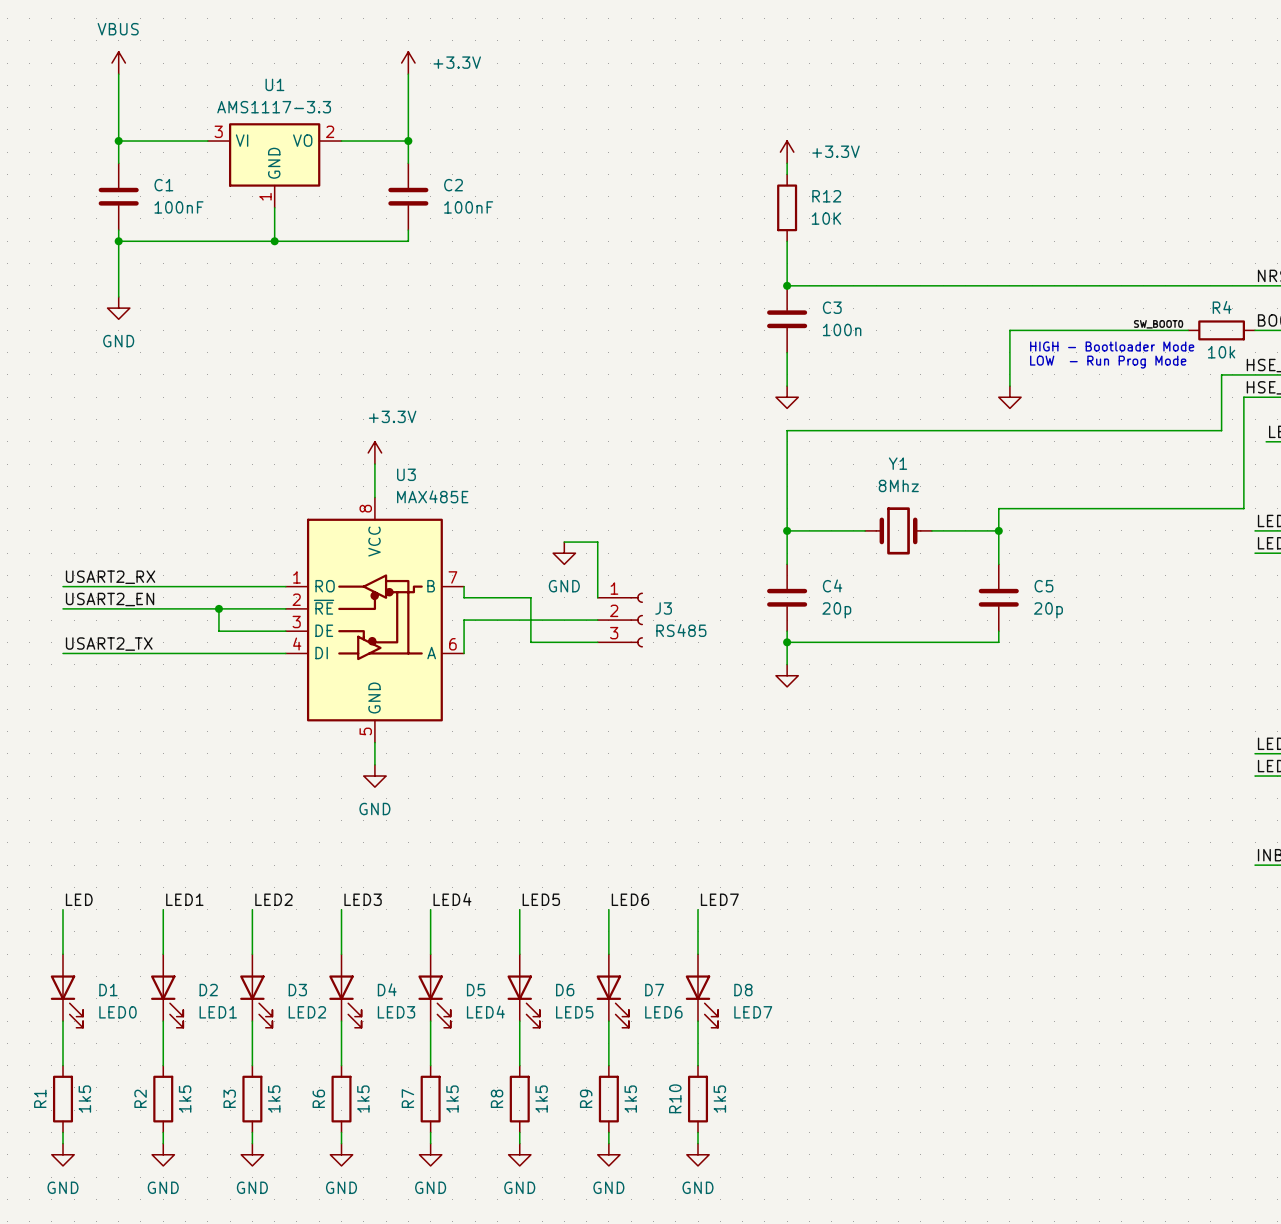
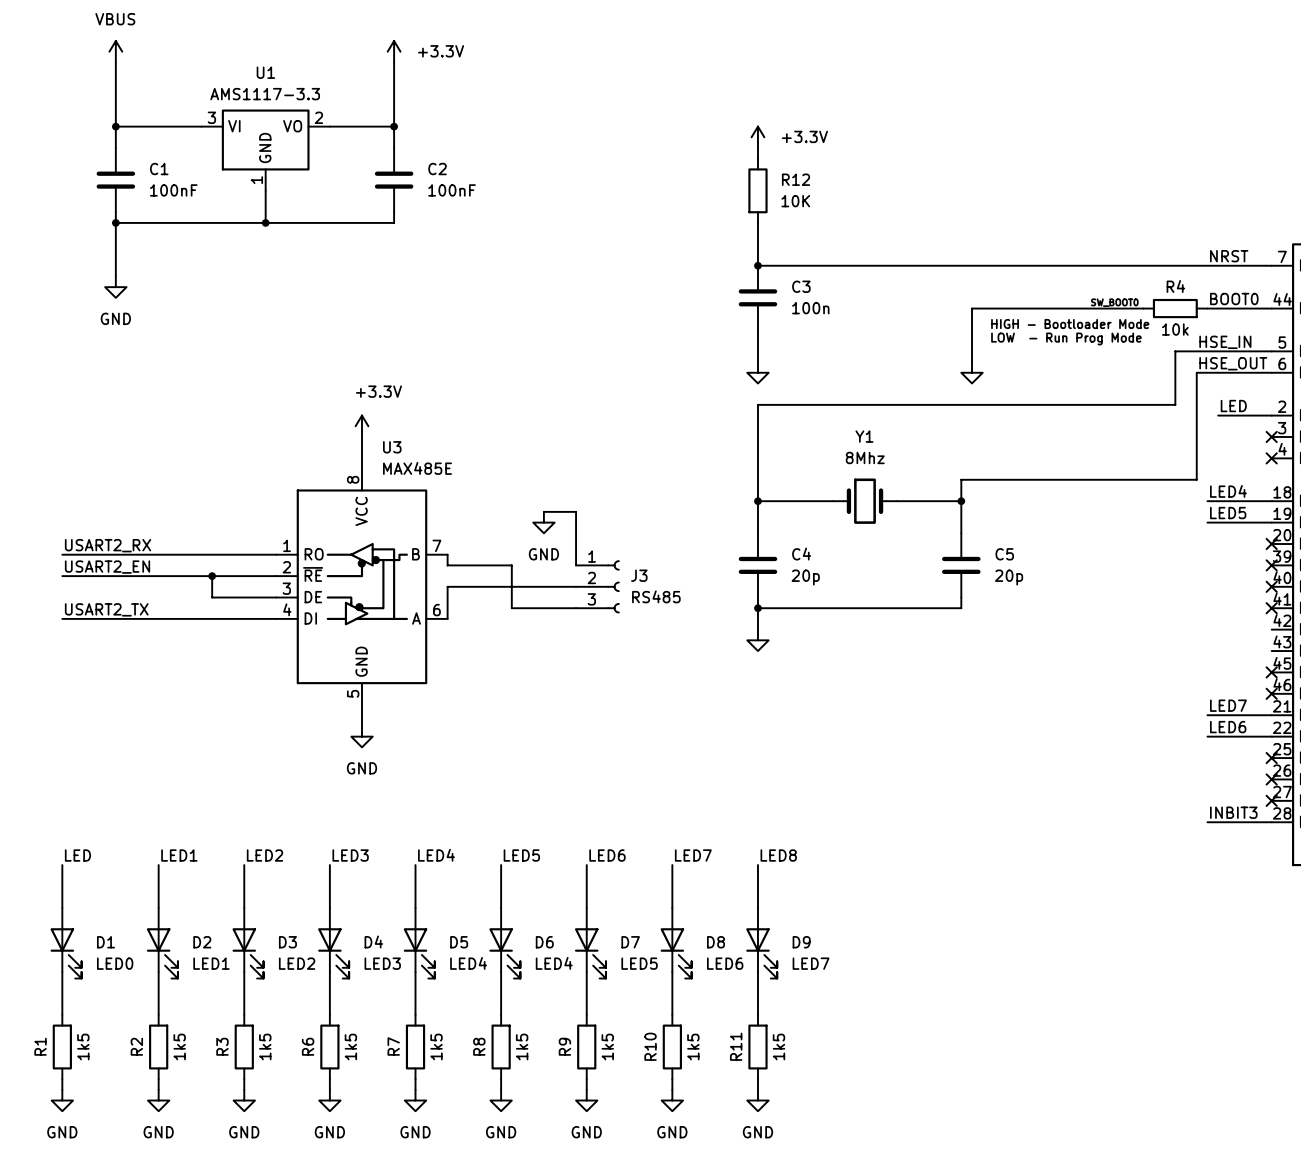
label: none -> LED8 (778, 855)
wire: none -> (757, 865) (757, 907)
D9: none -> LED7 (761, 943)
D6 value: LED5 (574, 1012) -> LED4 (554, 963)
D7 value: LED6 (663, 1012) -> LED5 (639, 963)
D8 value: LED7 (753, 1012) -> LED6 (725, 963)
wire: none -> (757, 972) (757, 1014)
R11: none -> 1k5 (757, 1047)
wire: none -> (757, 1079) (757, 1089)
power symbol: none -> GND (757, 1100)

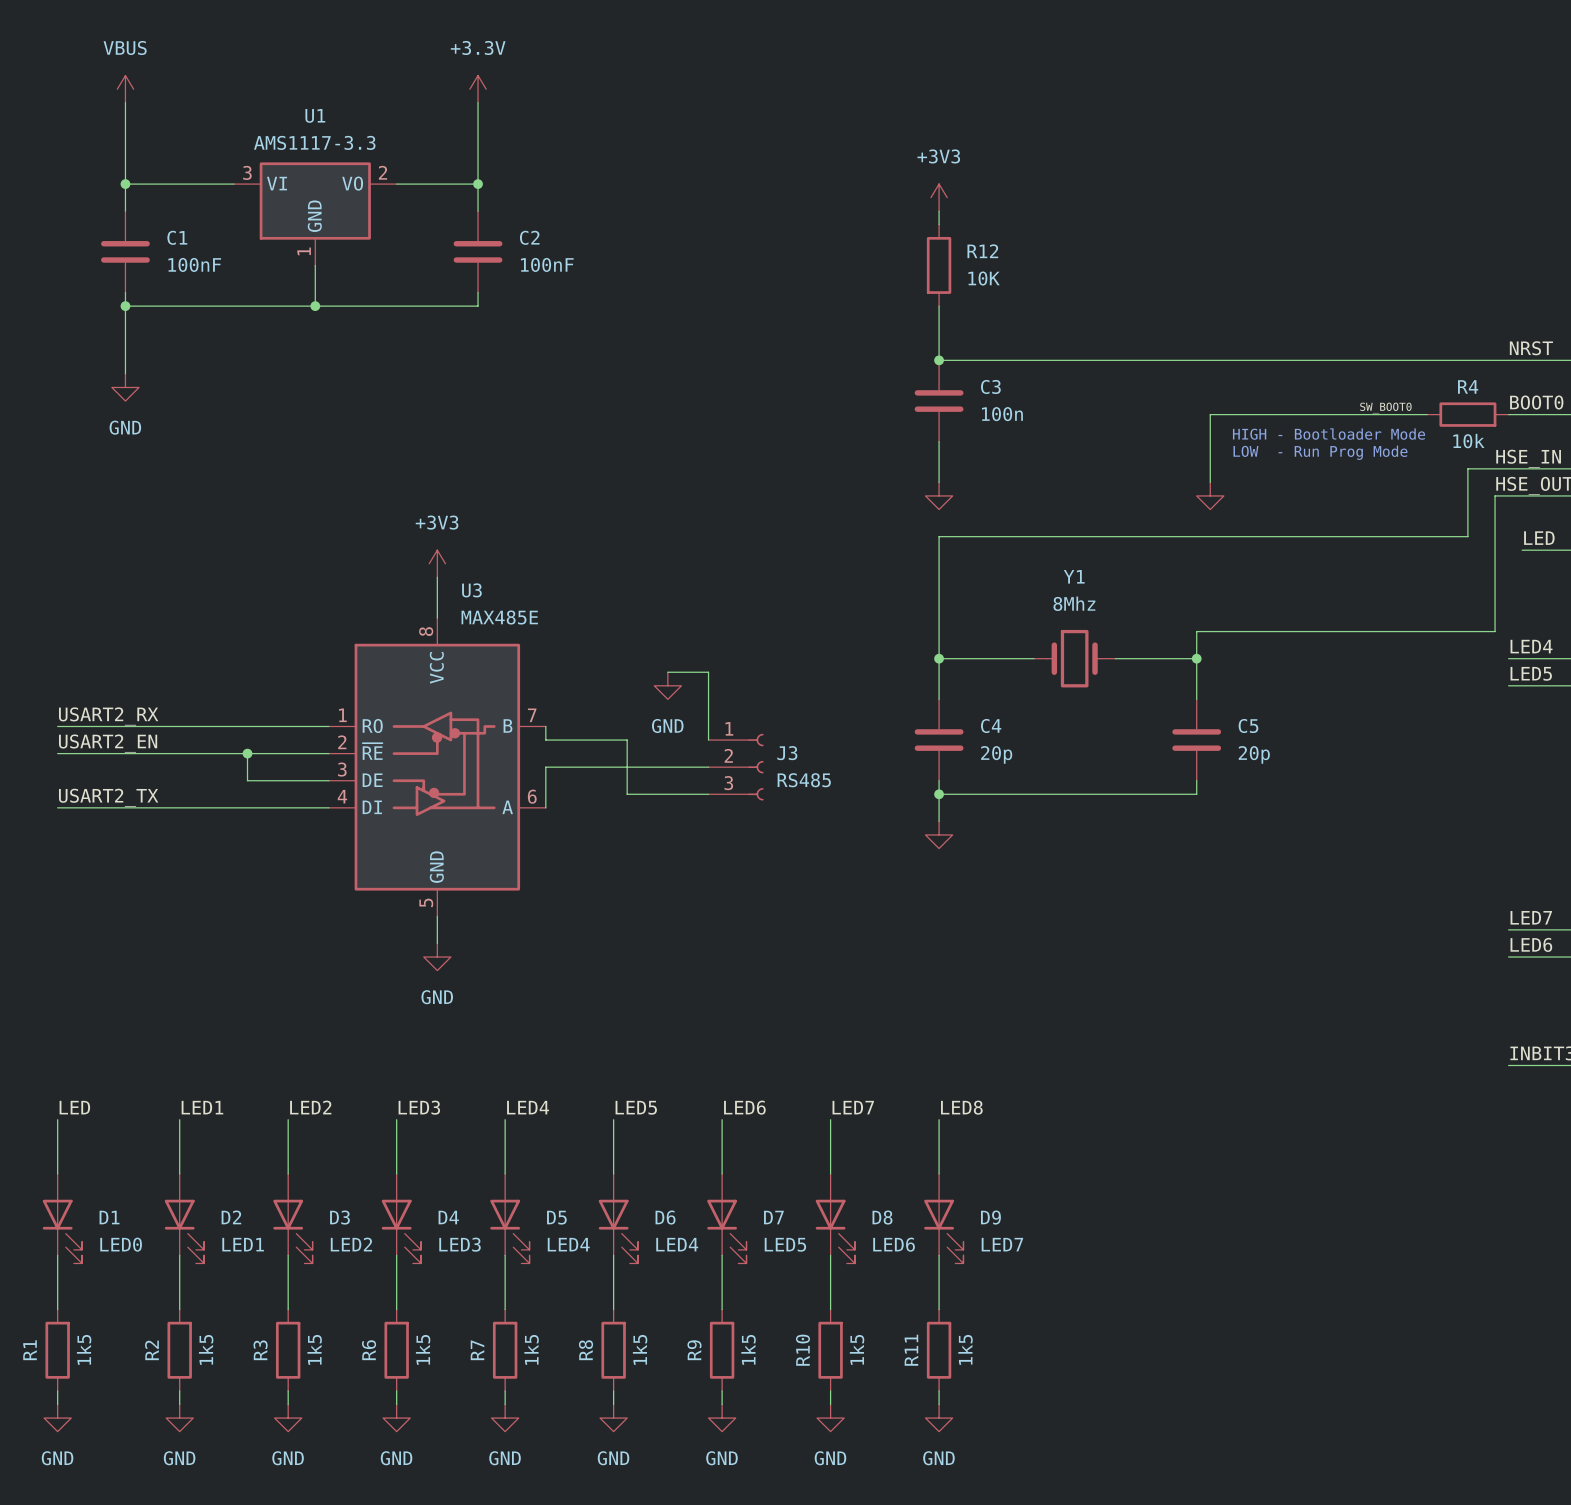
power symbol text position: +3.3V (441, 51) -> +3.3V (478, 47)
power symbol: +3.3V (757, 137) -> +3V3 (939, 197)
power symbol: +3.3V (361, 426) -> +3V3 (437, 563)

